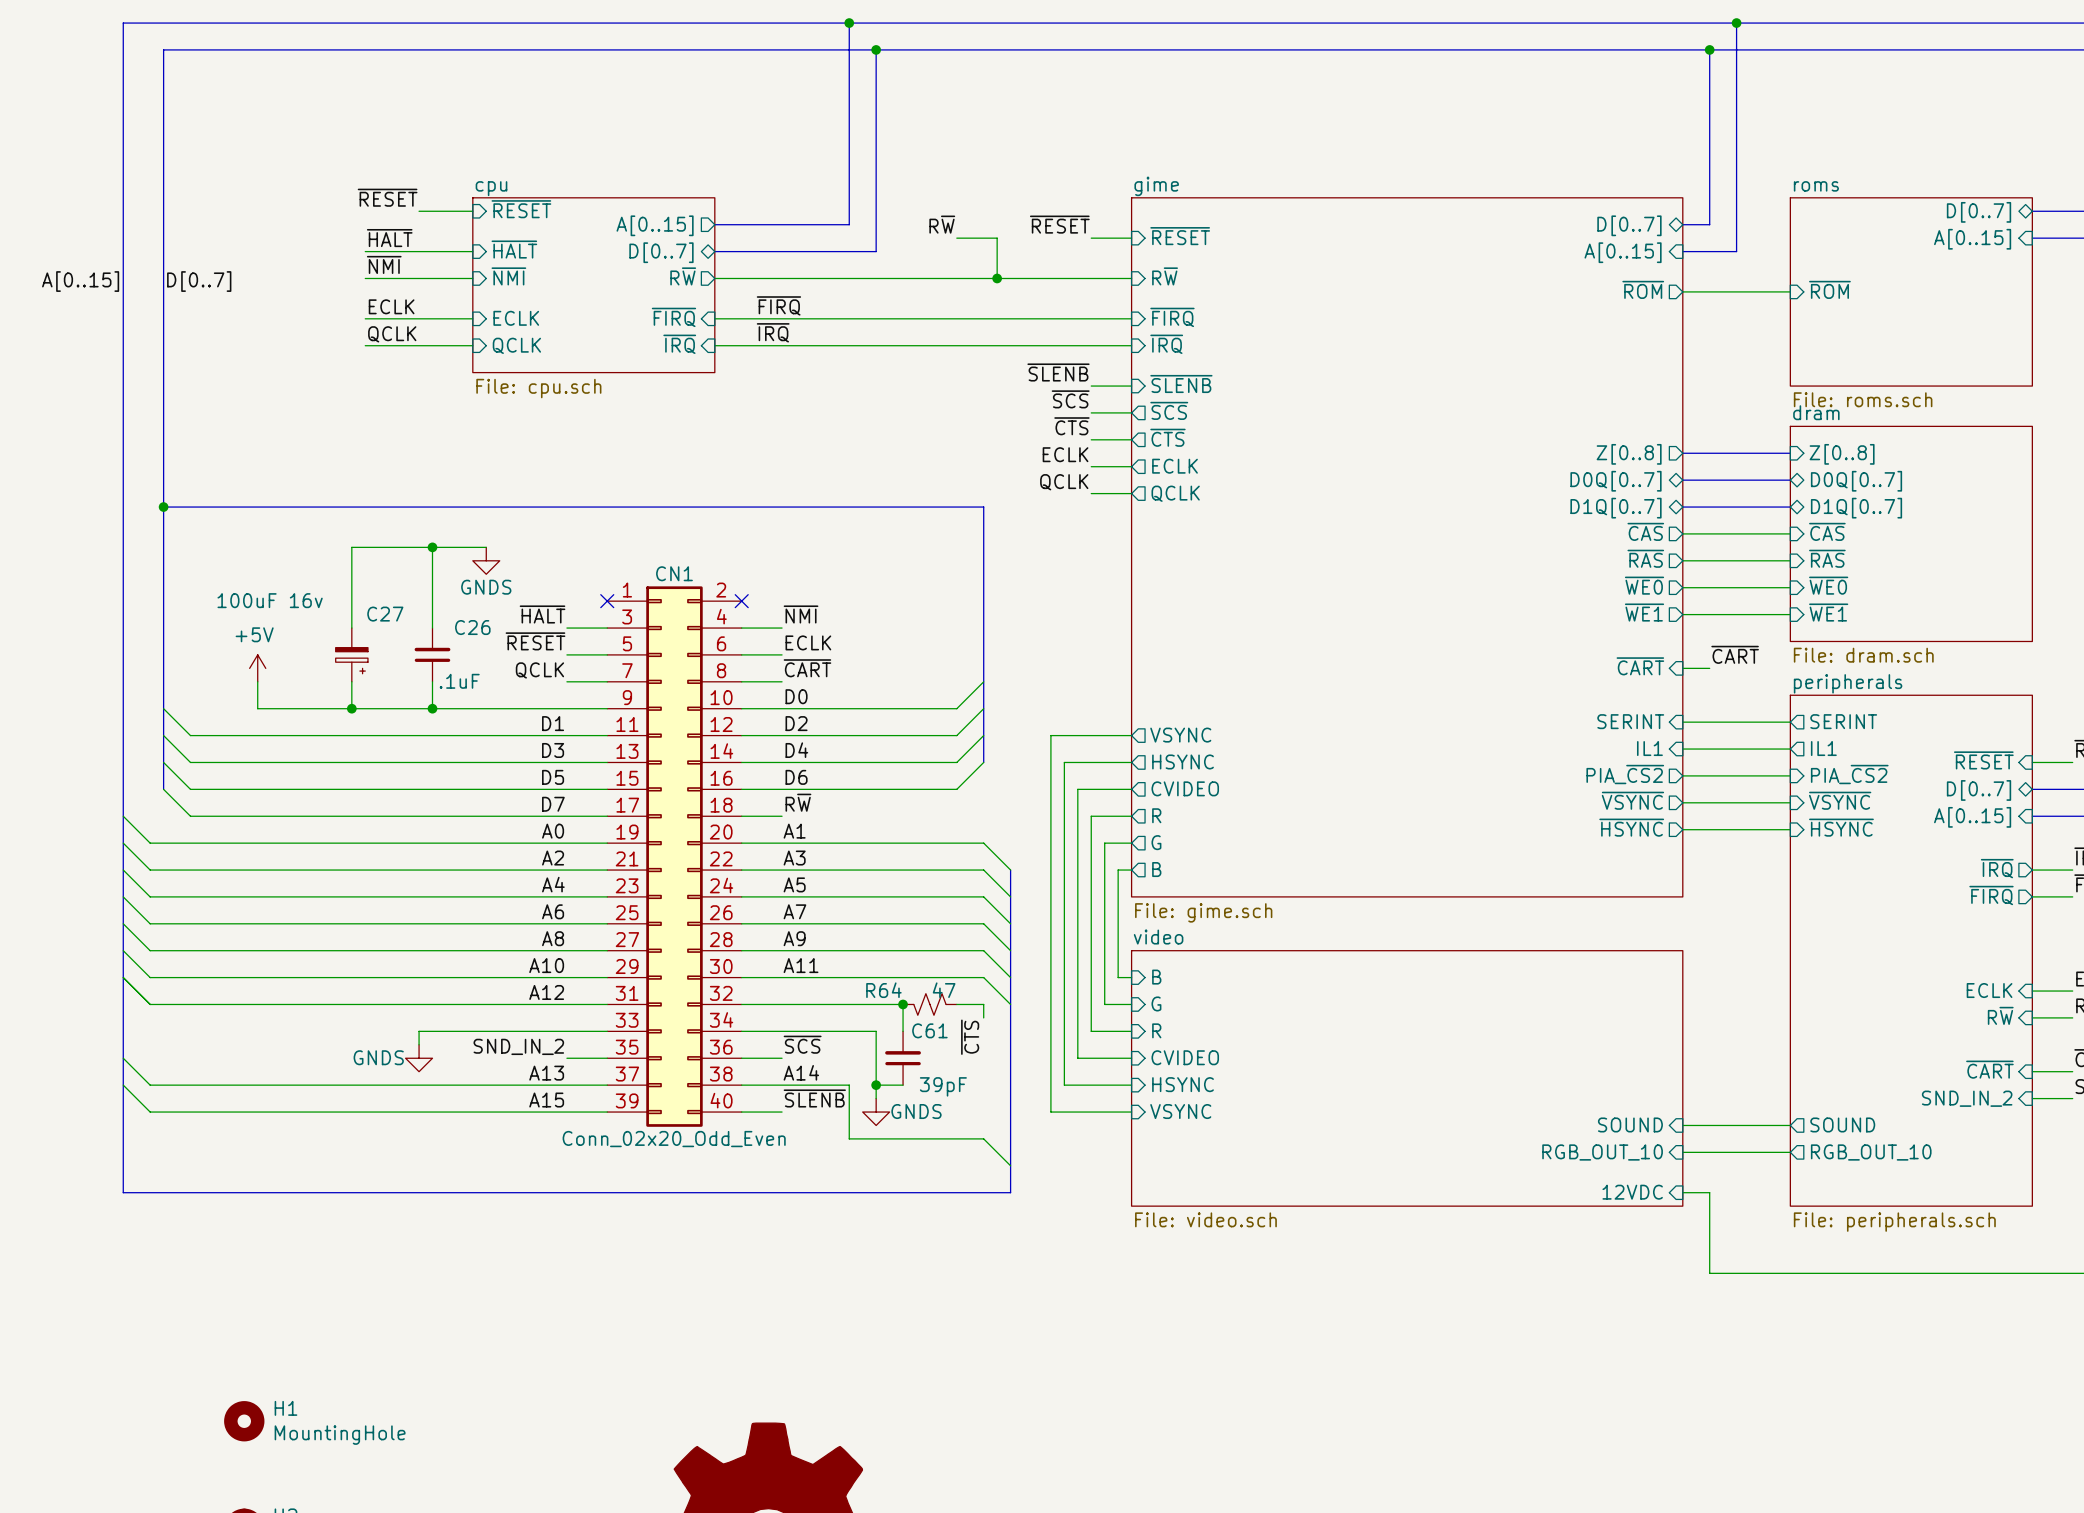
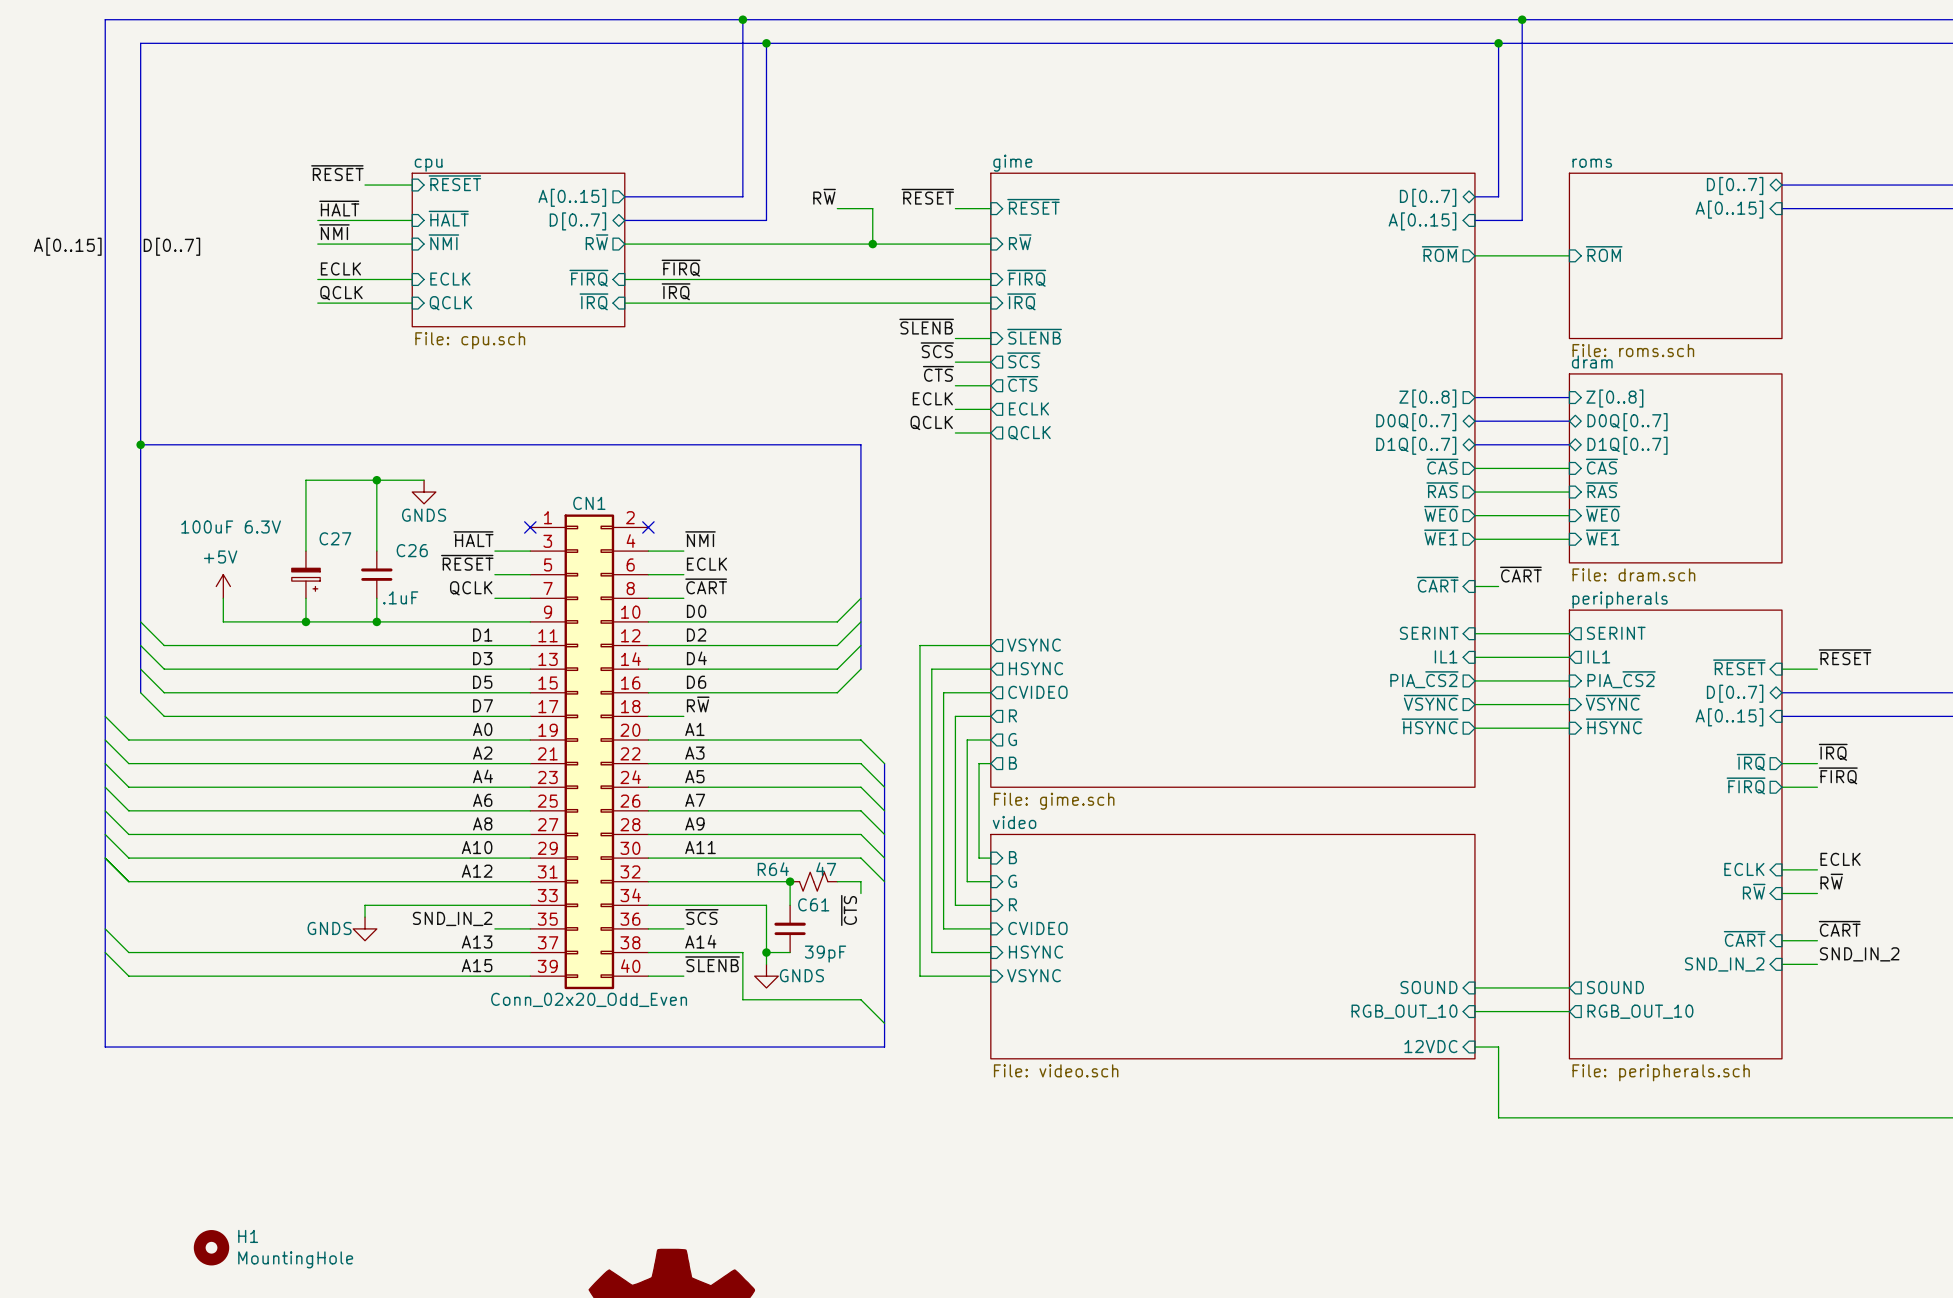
C27 value: 100uF 16v (270, 600) -> 100uF 6.3V (231, 527)

